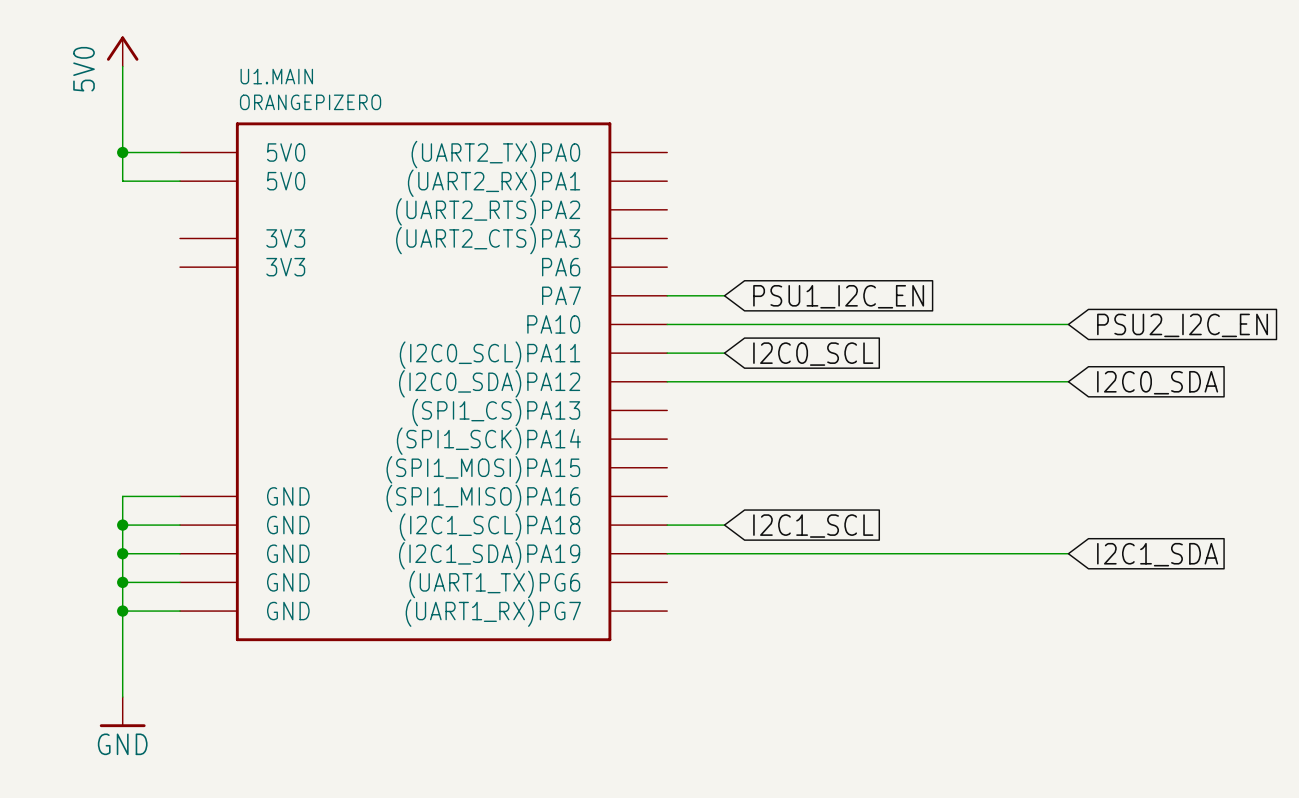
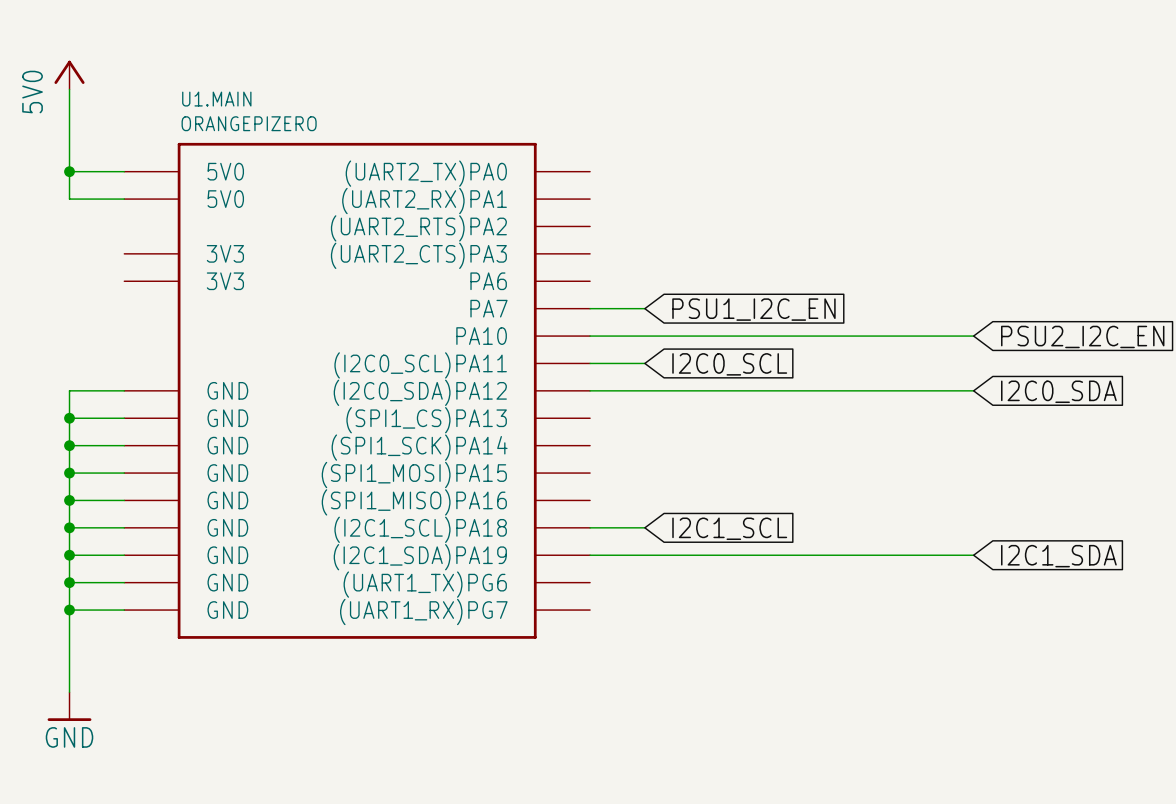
U1.MAIN symbol: [180, 122, 668, 642] -> [124, 142, 591, 639]
wire: none -> (124, 390) (69, 390) (69, 500)
wire: none -> (69, 418) (124, 418)
junction: none -> (69, 418)
wire: none -> (69, 445) (124, 445)
junction: none -> (69, 445)
wire: none -> (69, 473) (124, 473)
junction: none -> (69, 473)
junction: none -> (69, 500)

